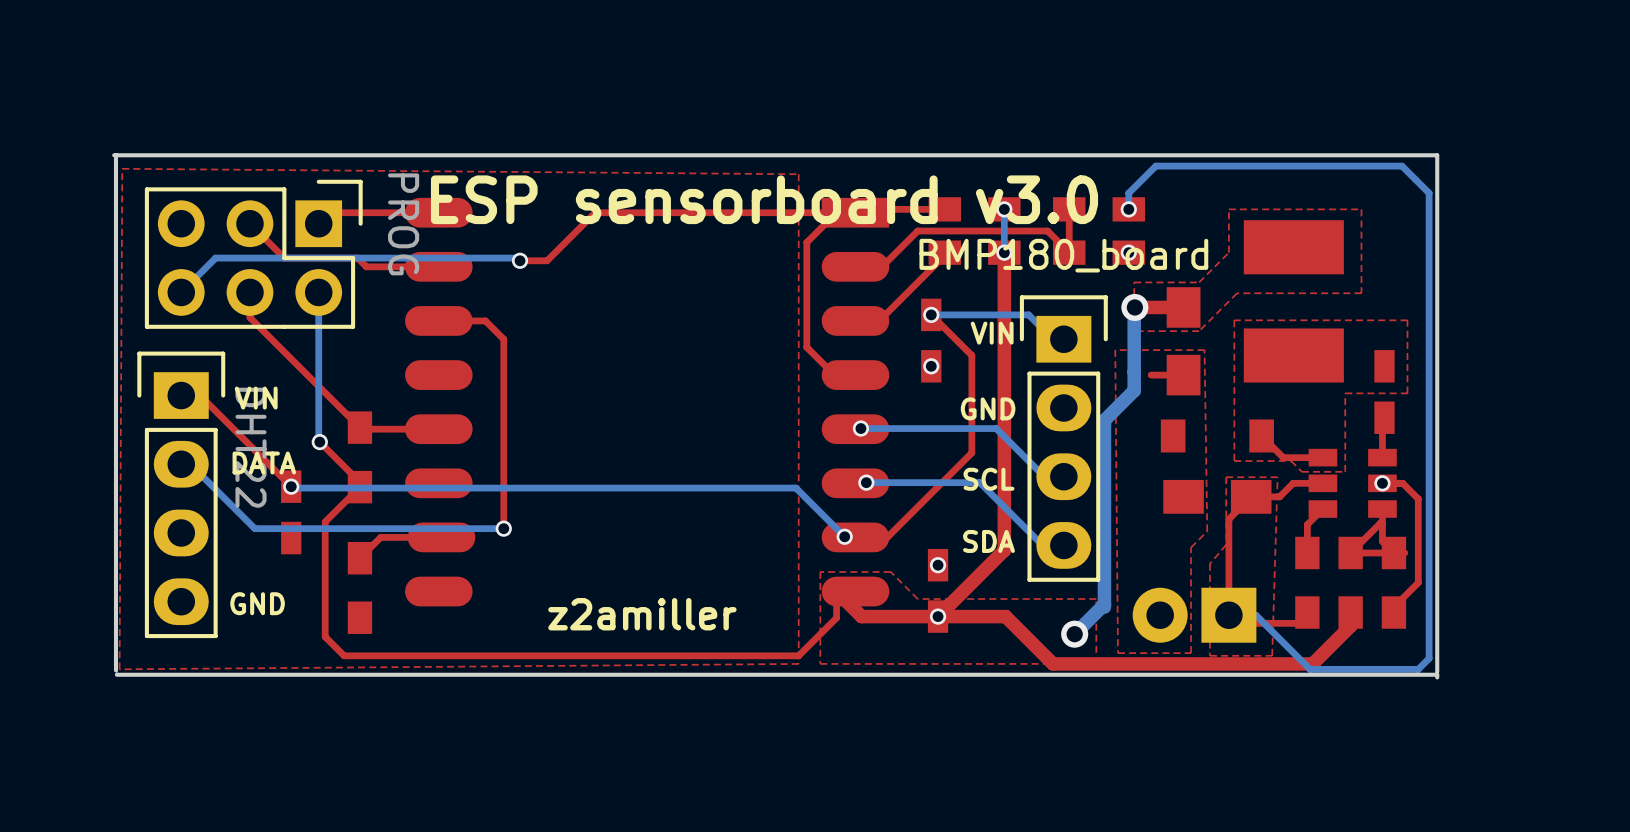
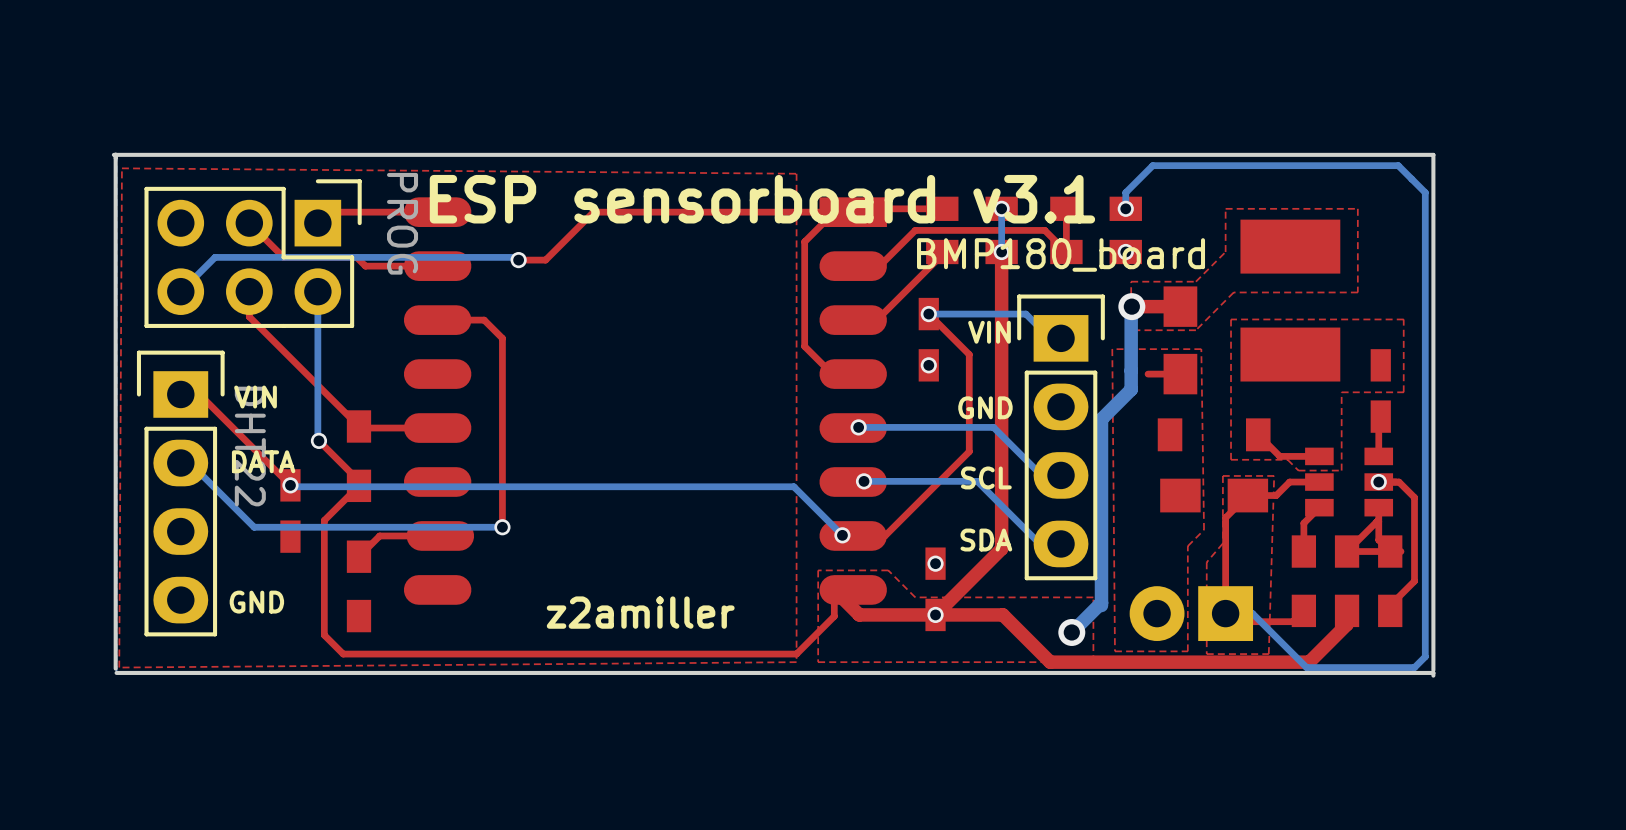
text: ESP sensorboard v3.0 (764, 199) -> ESP sensorboard v3.1 (762, 199)

